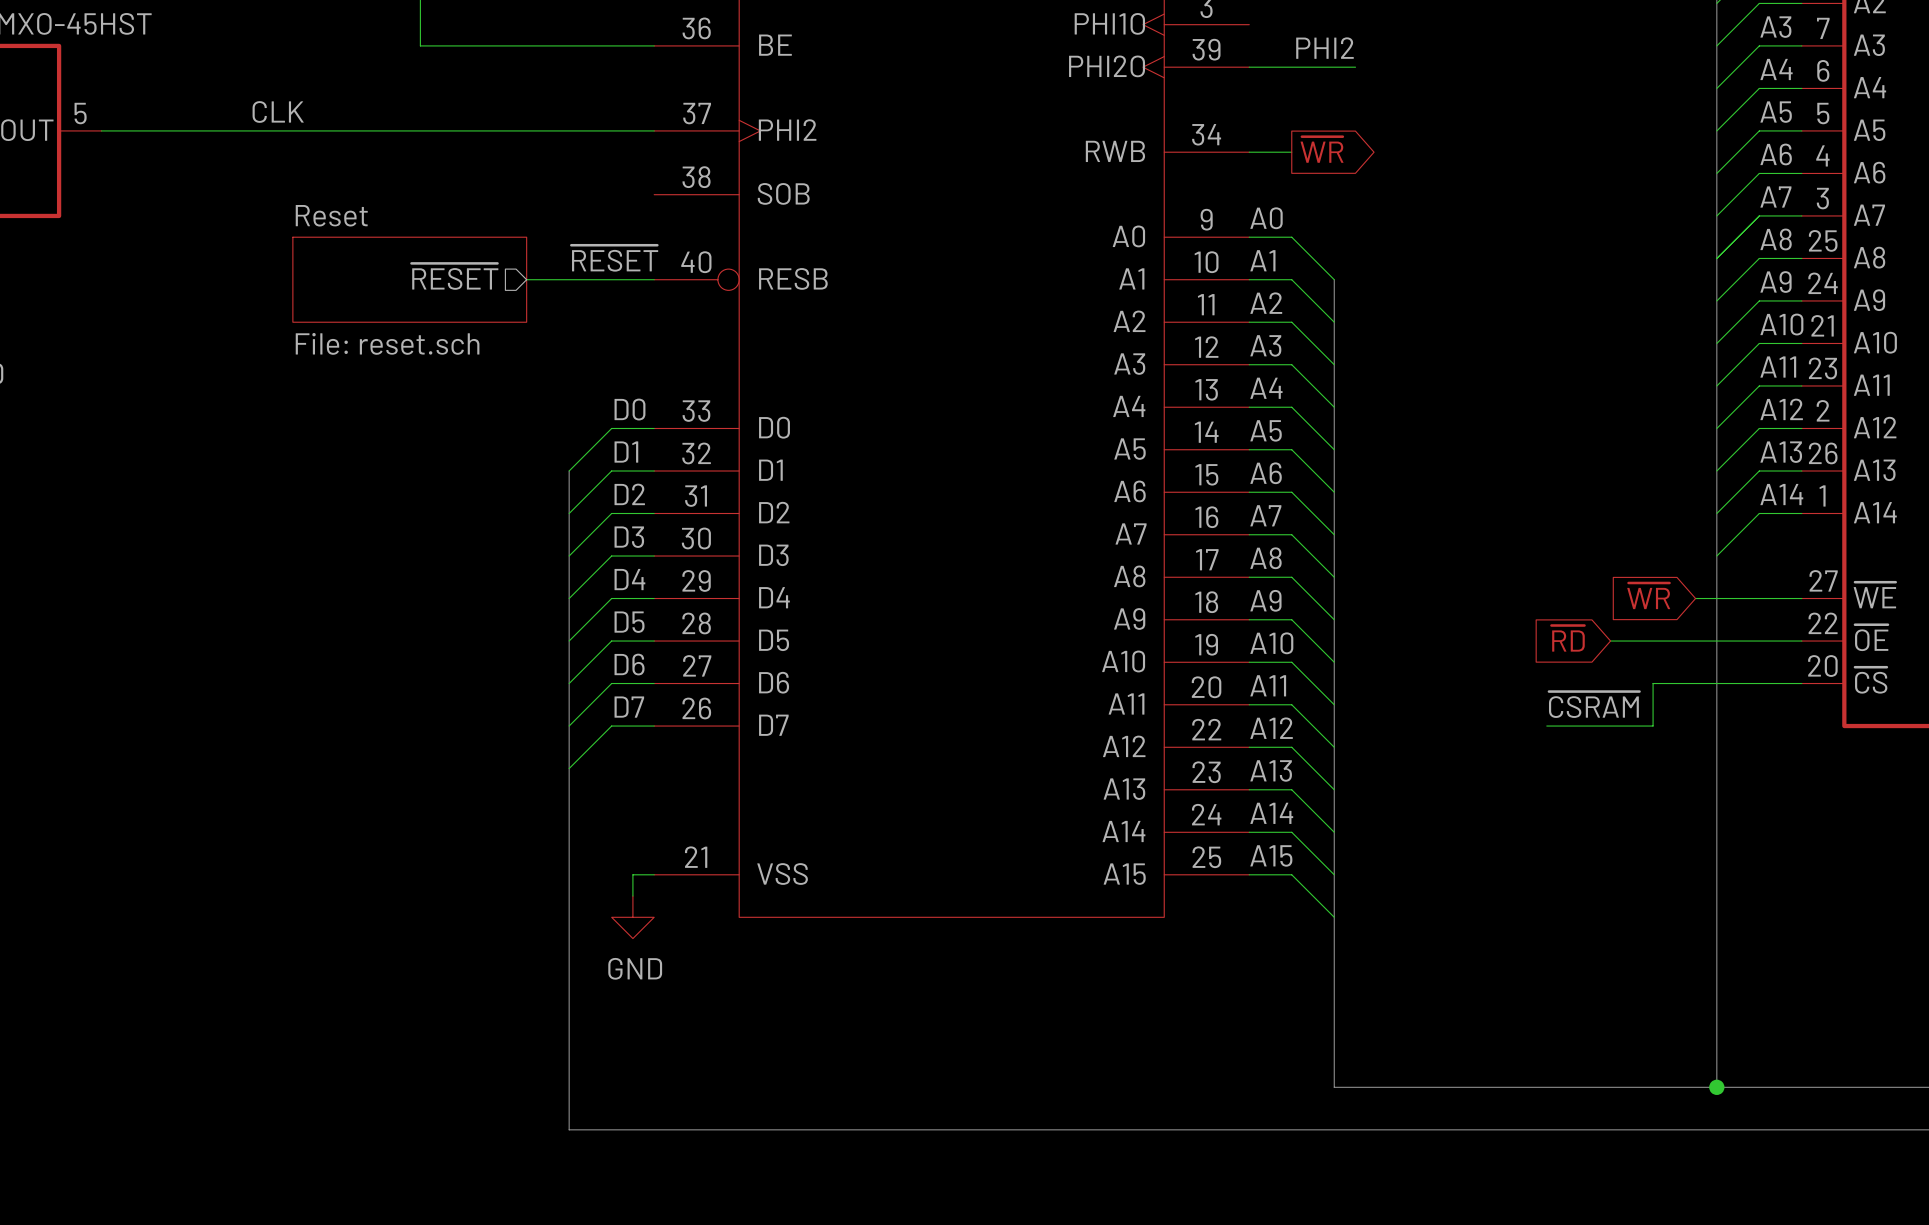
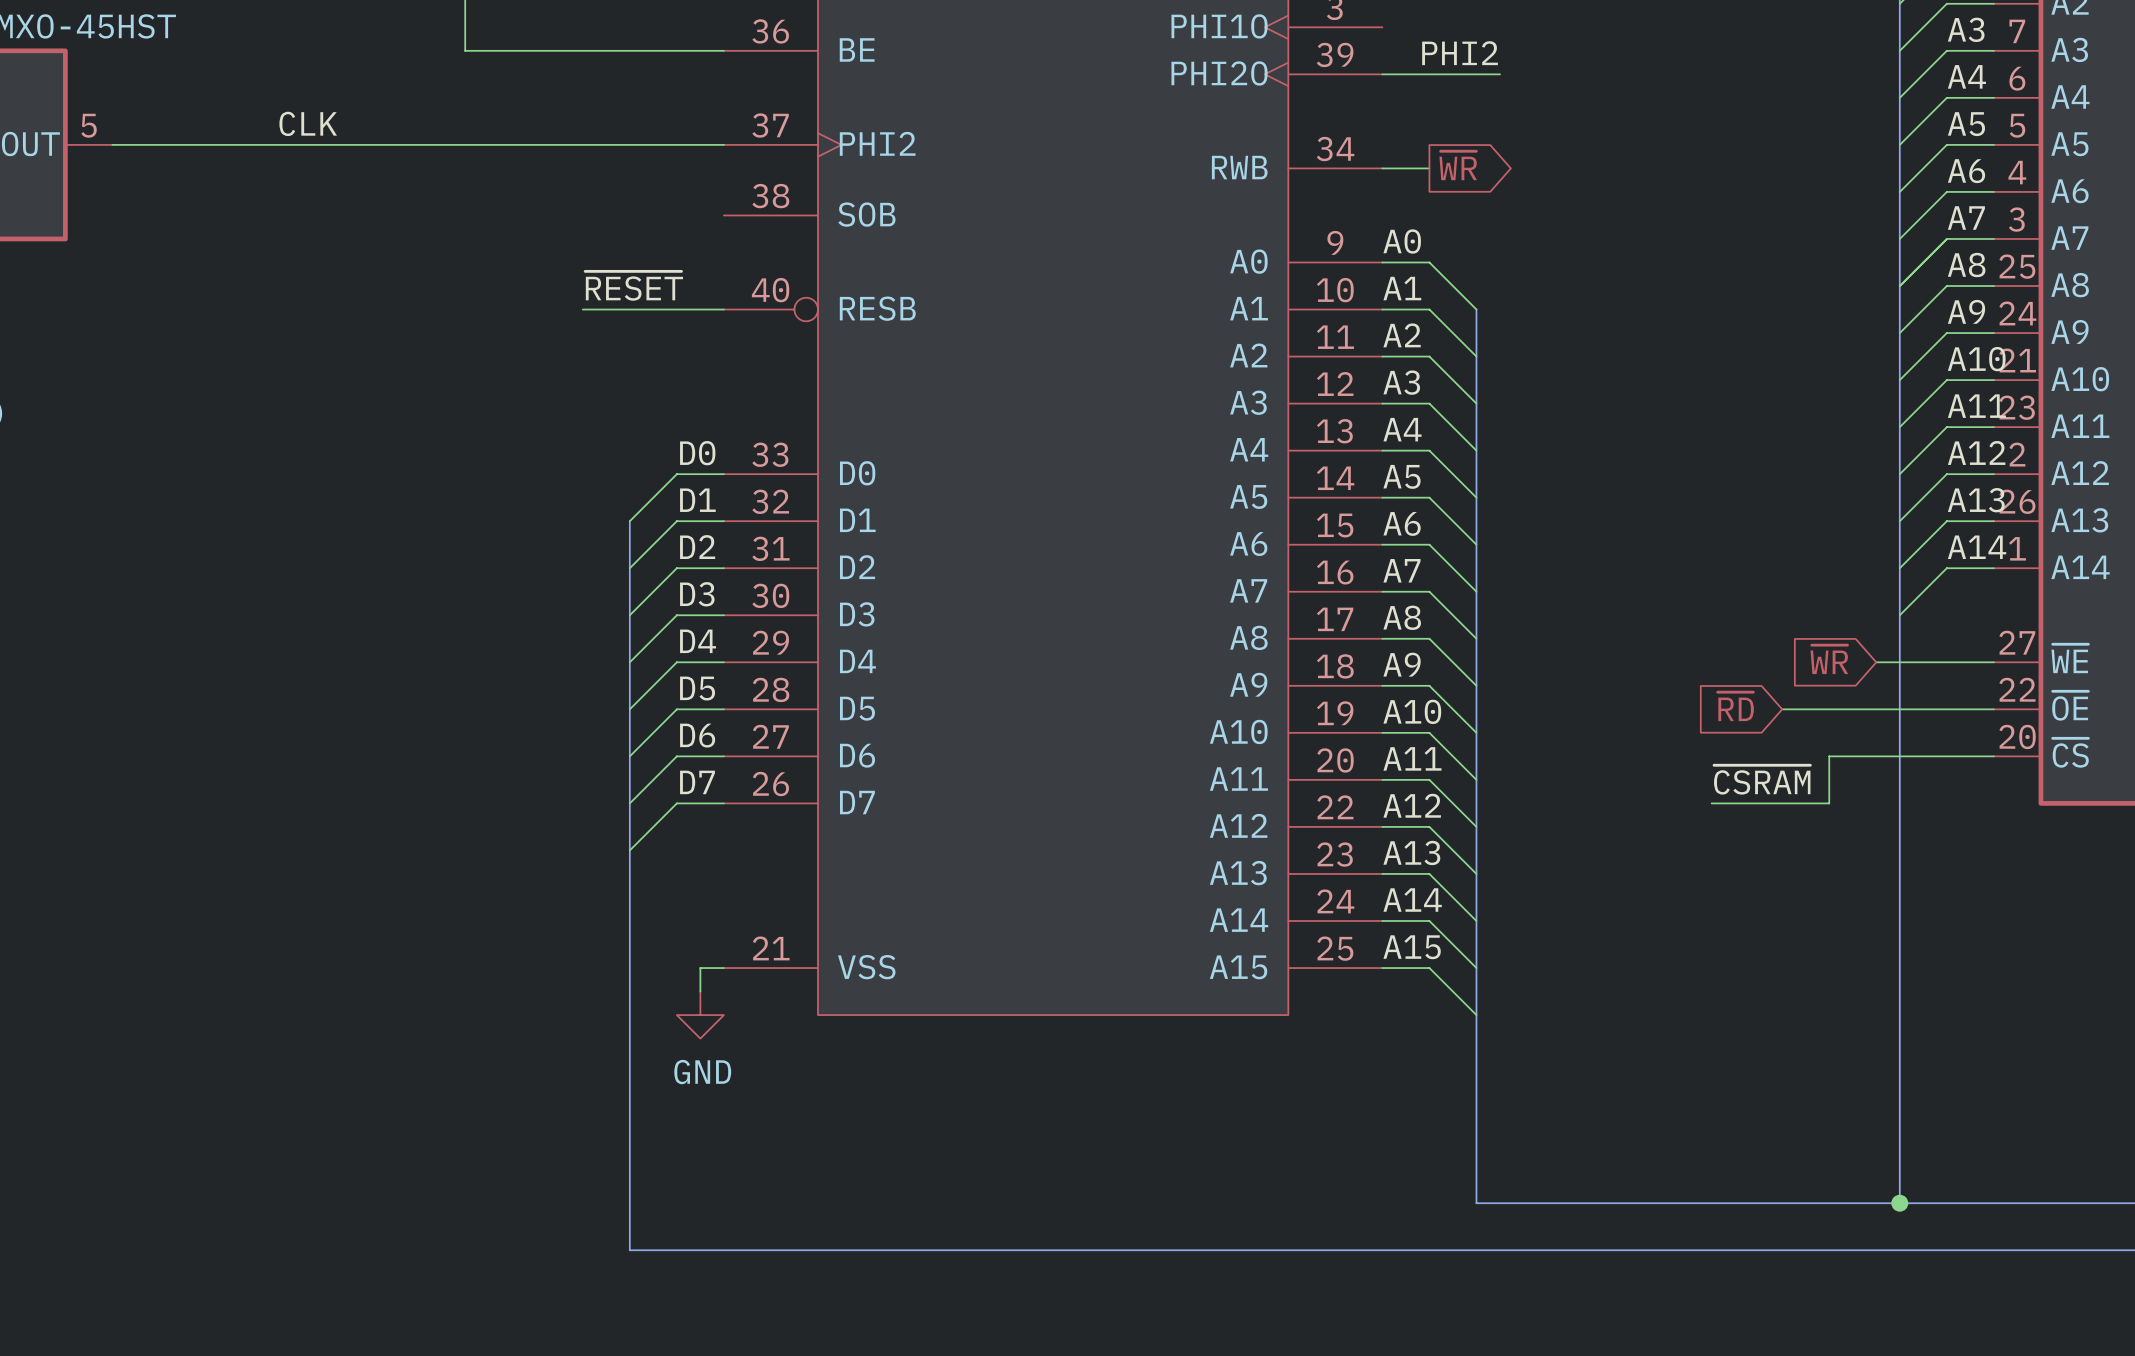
label position: ~{RESET} (614, 258) -> ~{RESET} (634, 286)
sheet pin: ~{RESET} (454, 276) -> none
sheet Reset: File: reset.sch (409, 279) -> none

